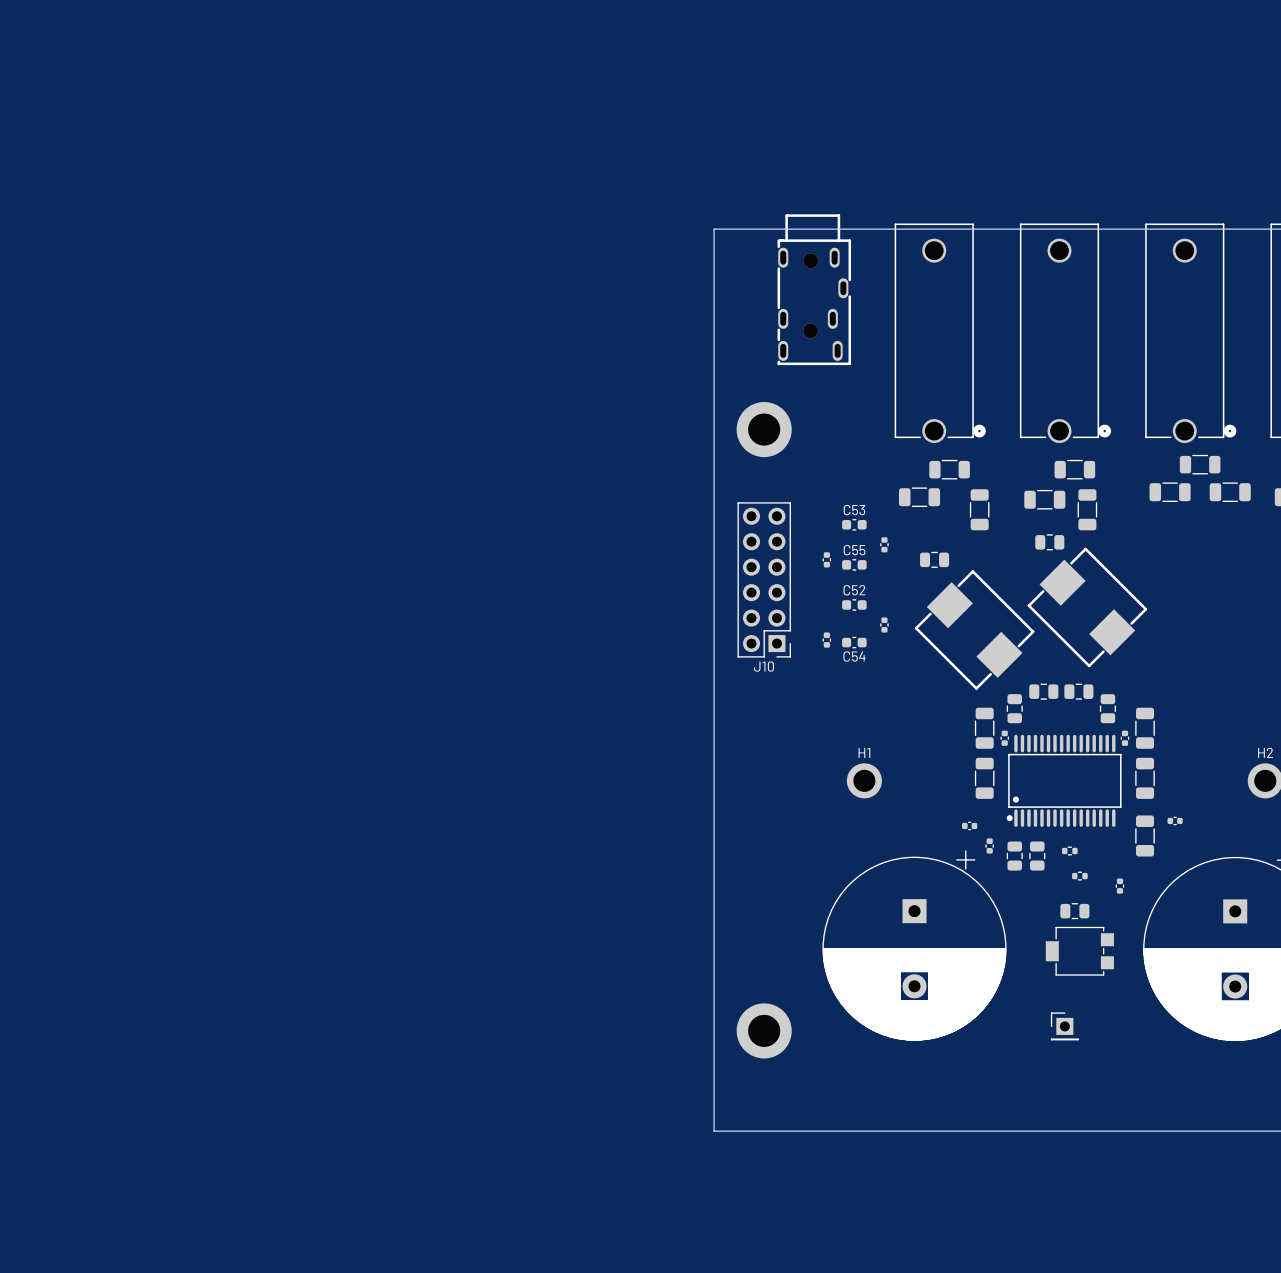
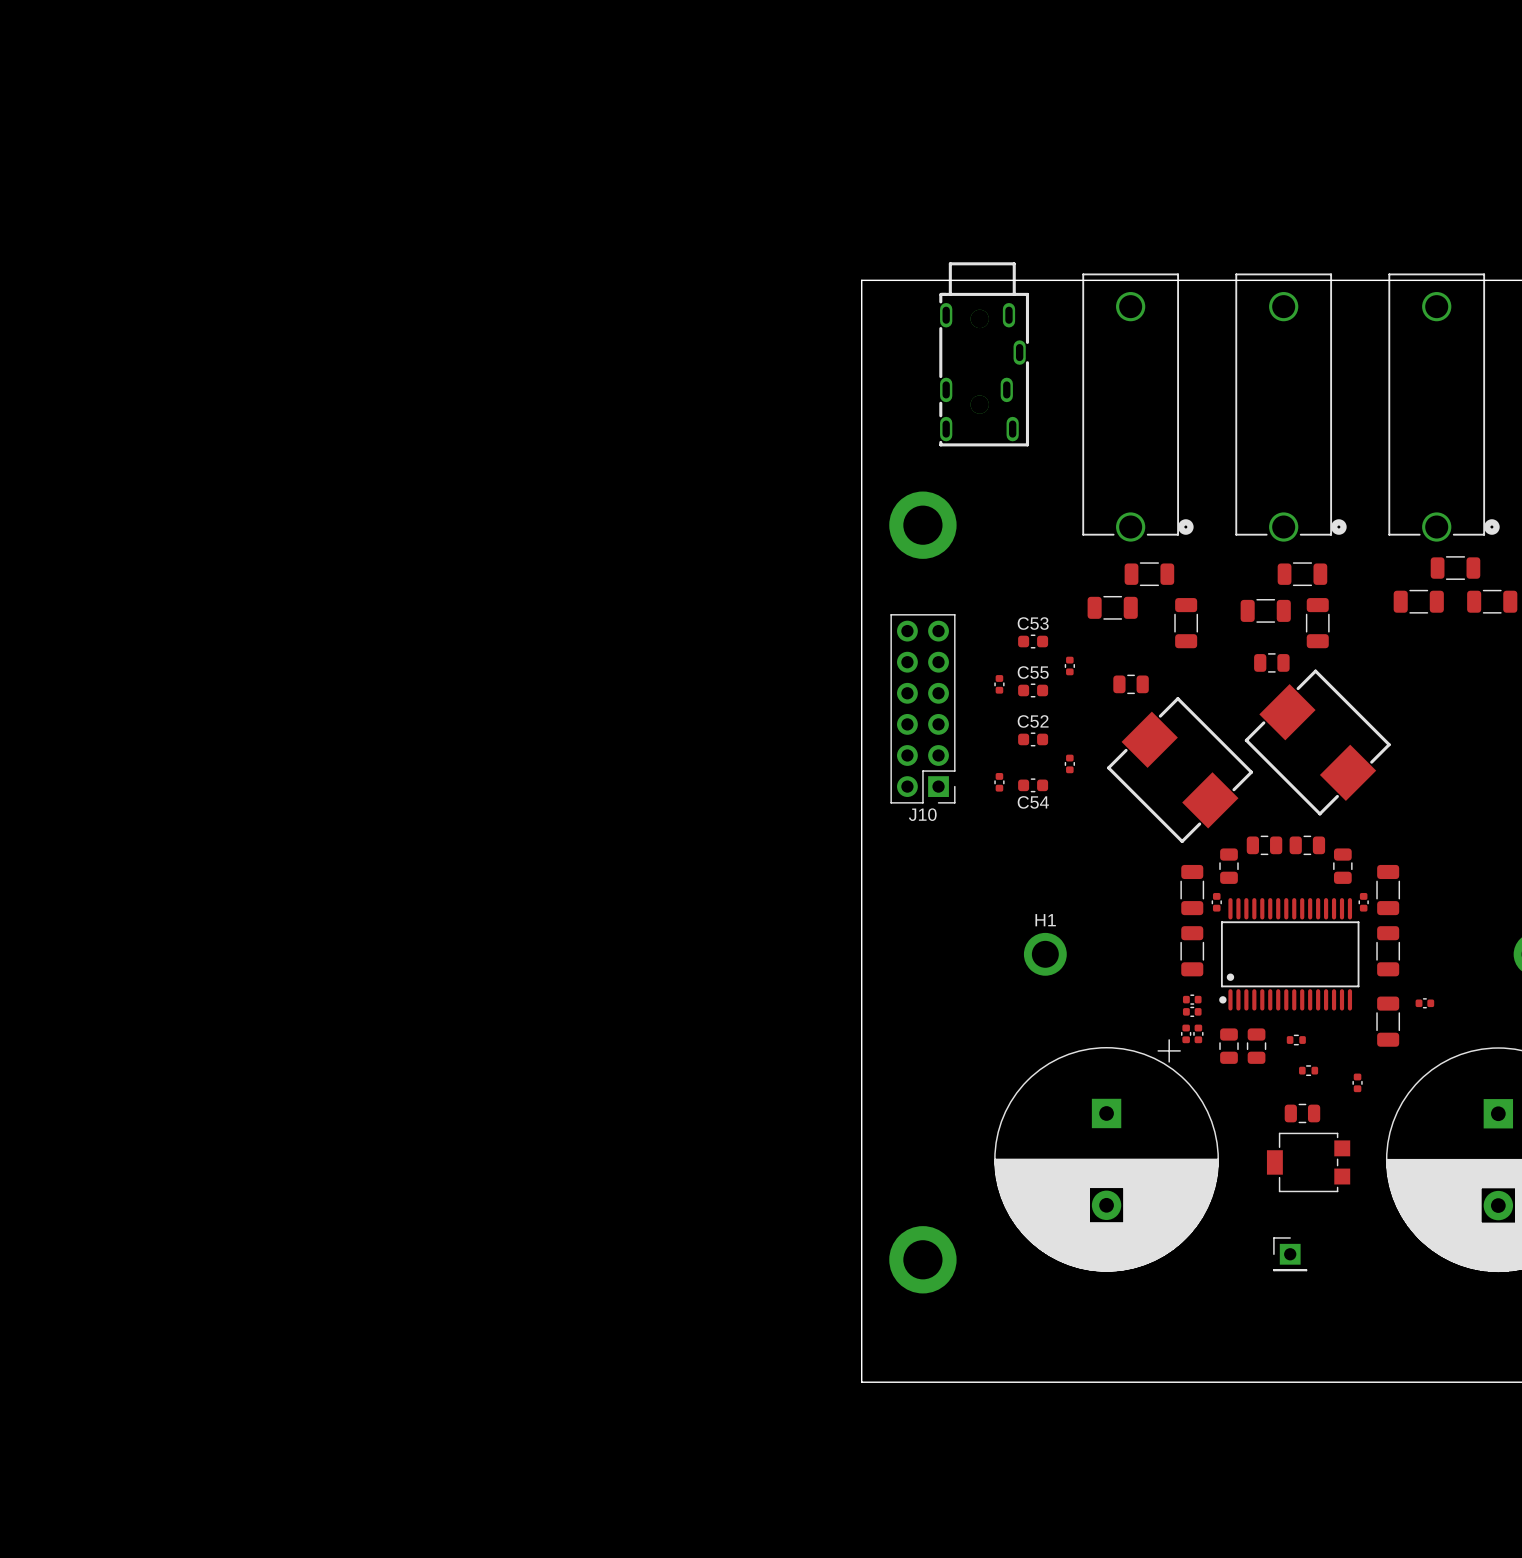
part: none -> (1192, 999)
part: (969, 825) -> none
part: none -> (1192, 1011)
part: none -> (1186, 1033)

